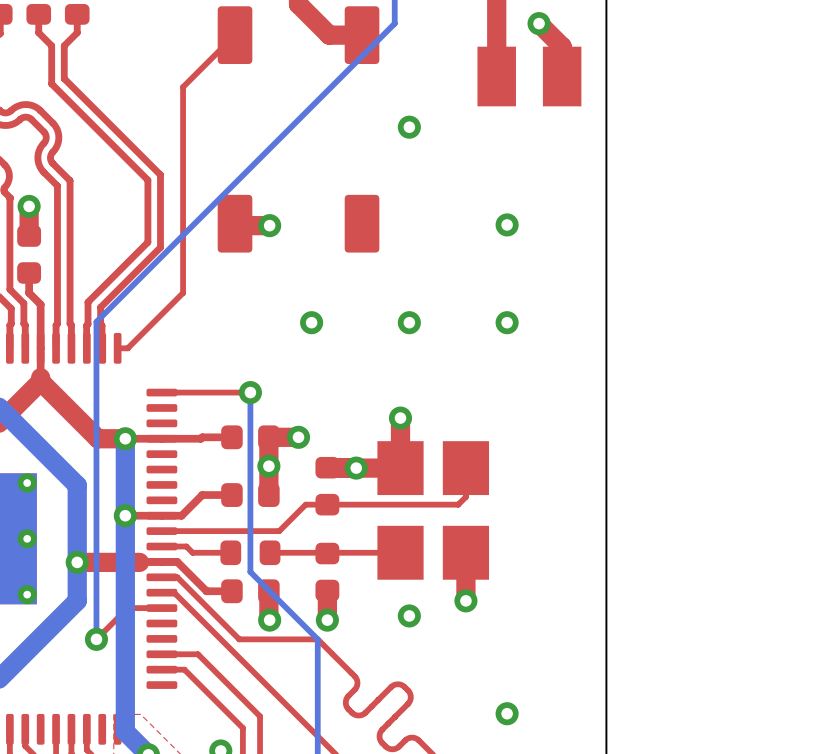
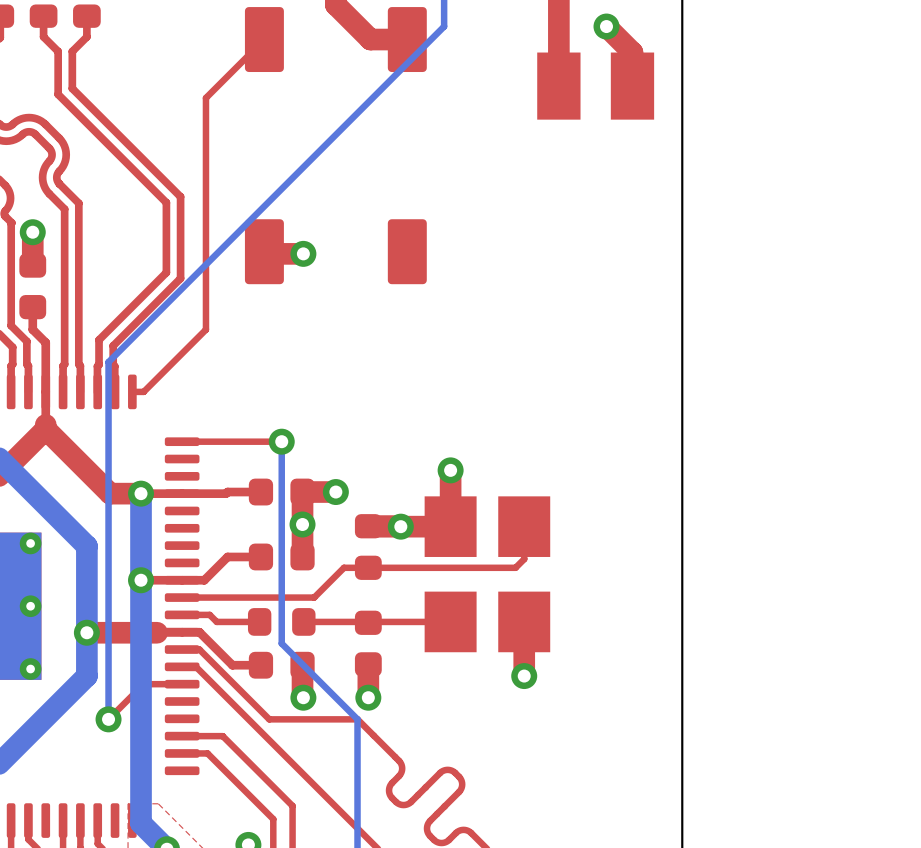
via: (409, 127) -> none
via: (507, 224) -> none
via: (311, 322) -> none
via: (409, 322) -> none
via: (507, 322) -> none
via: (409, 615) -> none
via: (507, 713) -> none

